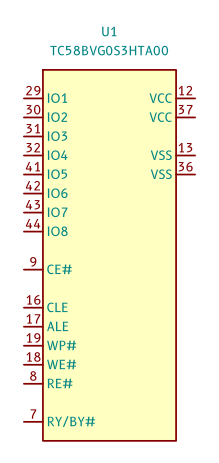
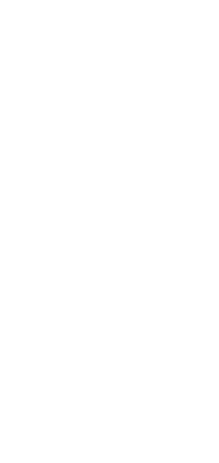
U1: TC58BVG0S3HTA00 (109, 255) -> none

